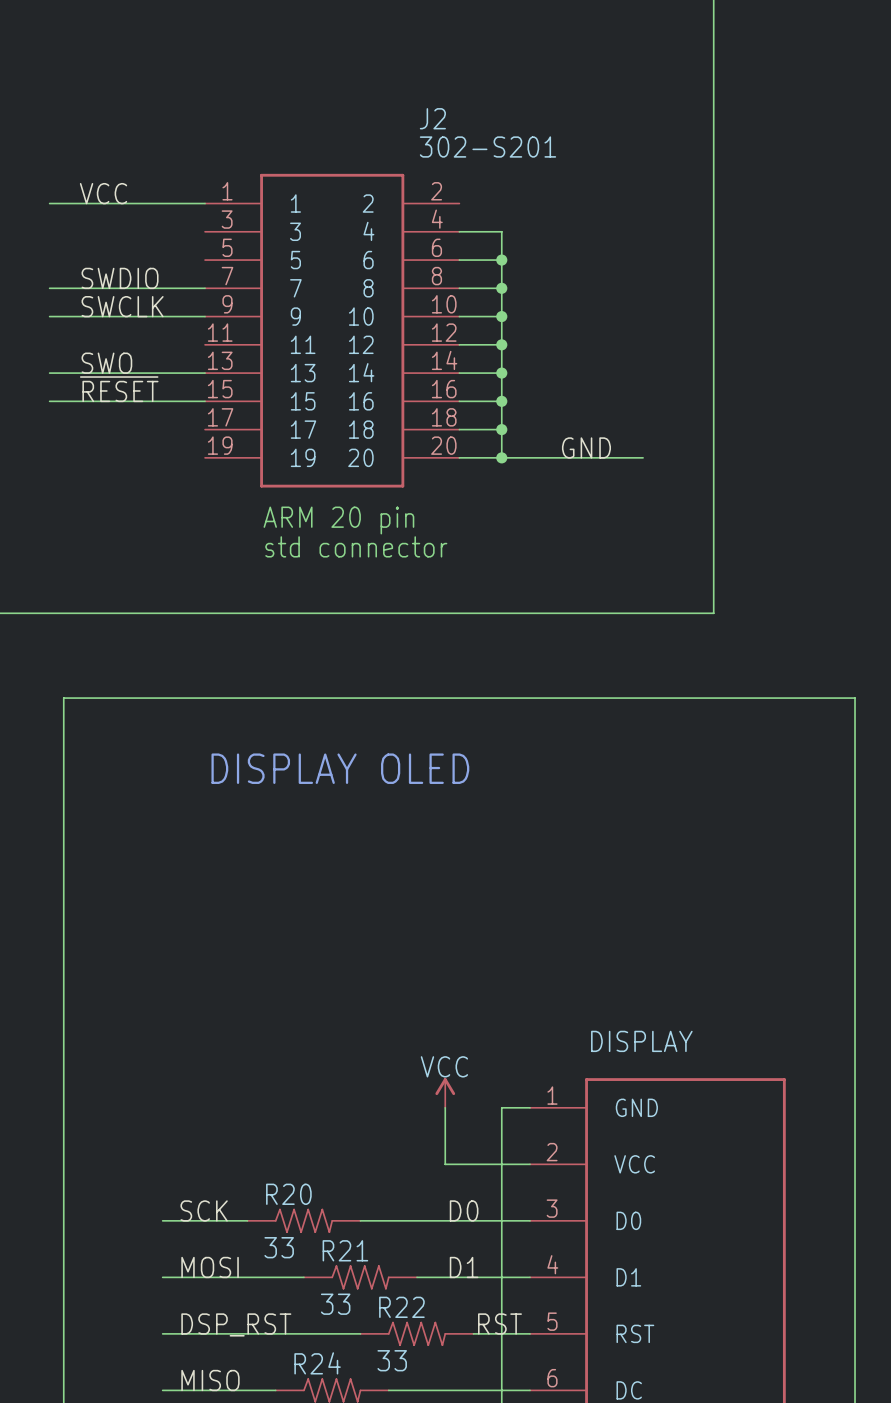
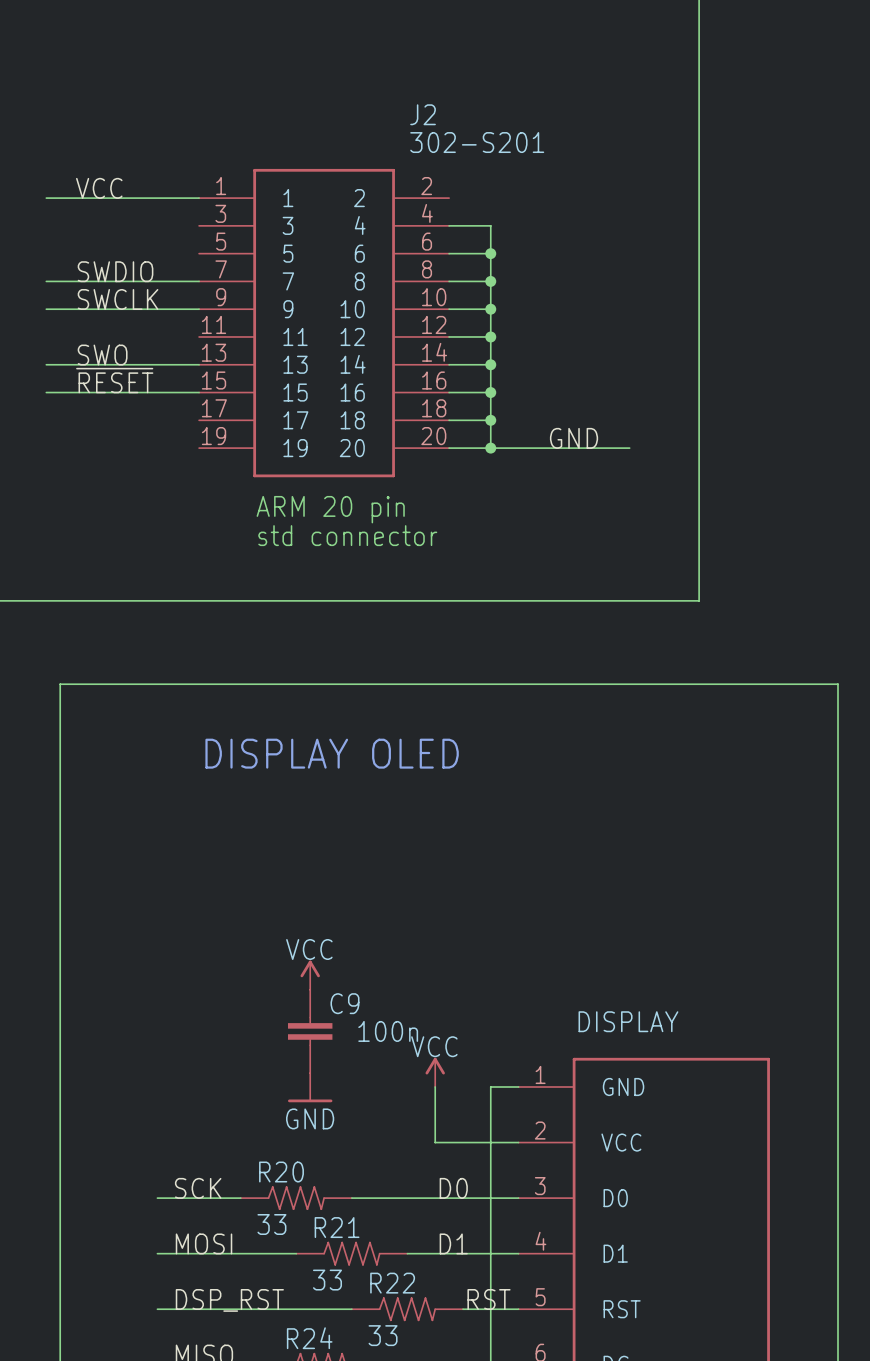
power symbol: none -> VCC (310, 975)
C9: none -> 100n (310, 1031)
power symbol: none -> GND (310, 1087)

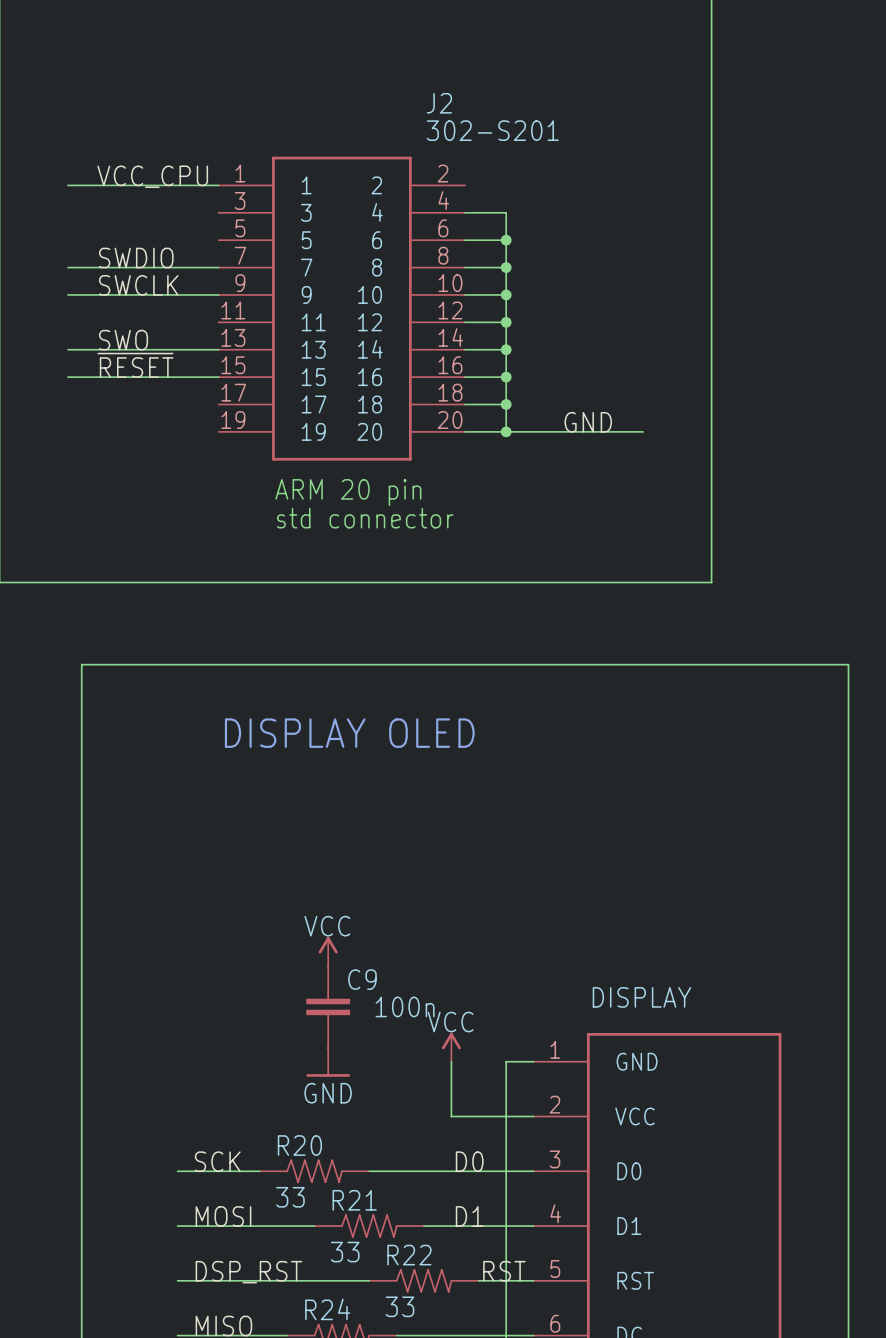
label: VCC (99, 188) -> VCC_CPU (152, 176)

